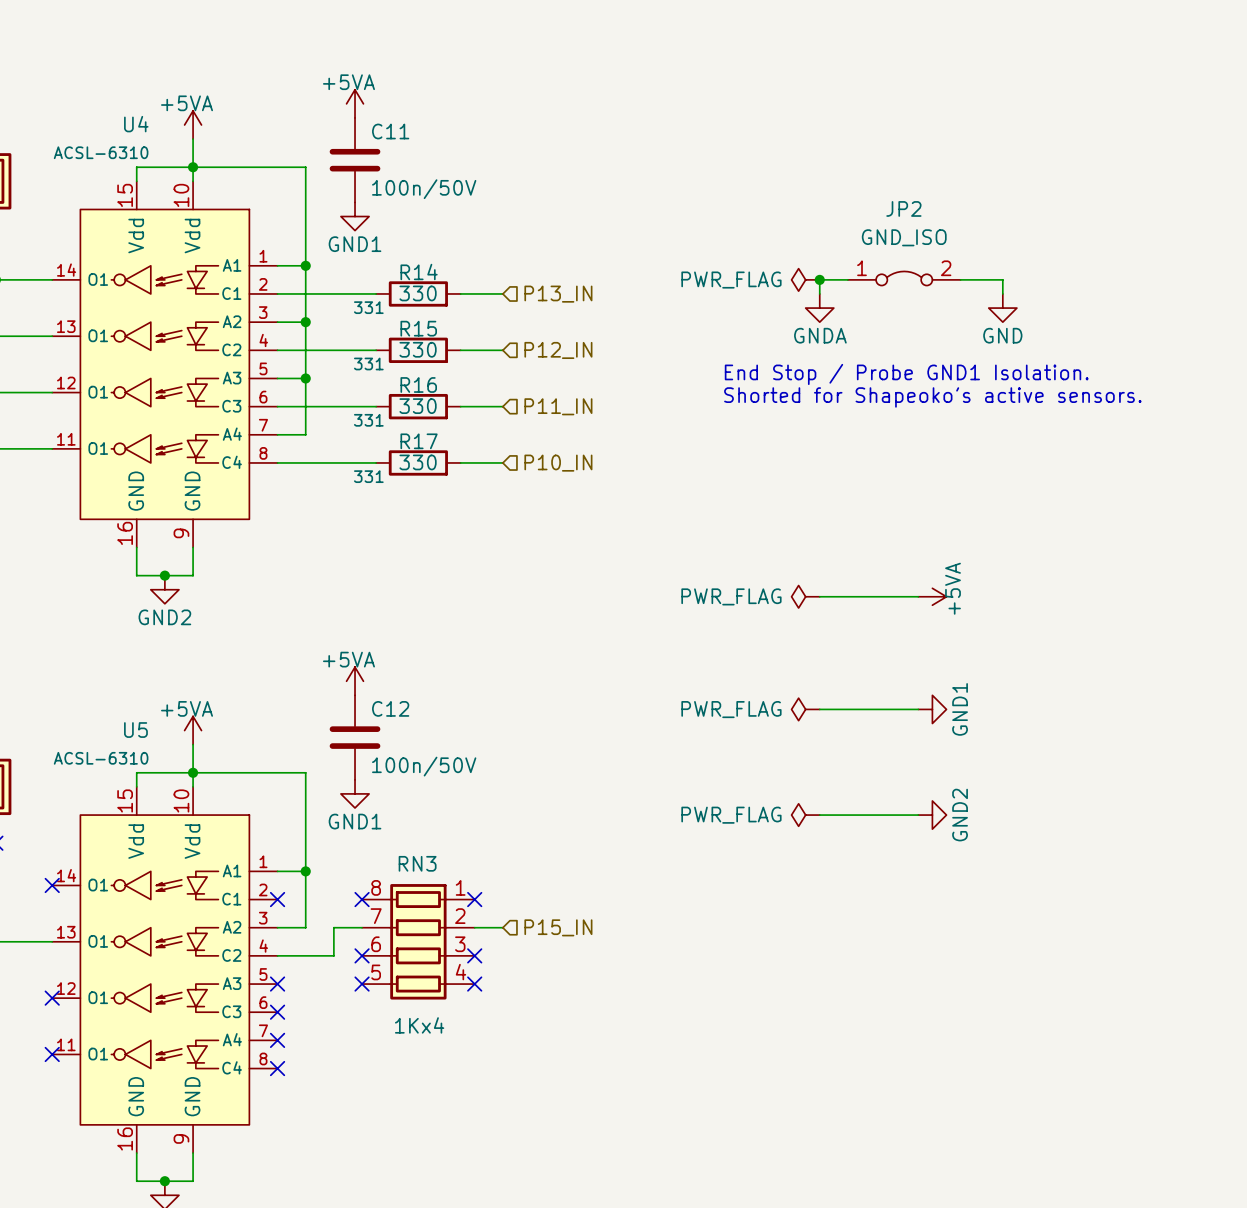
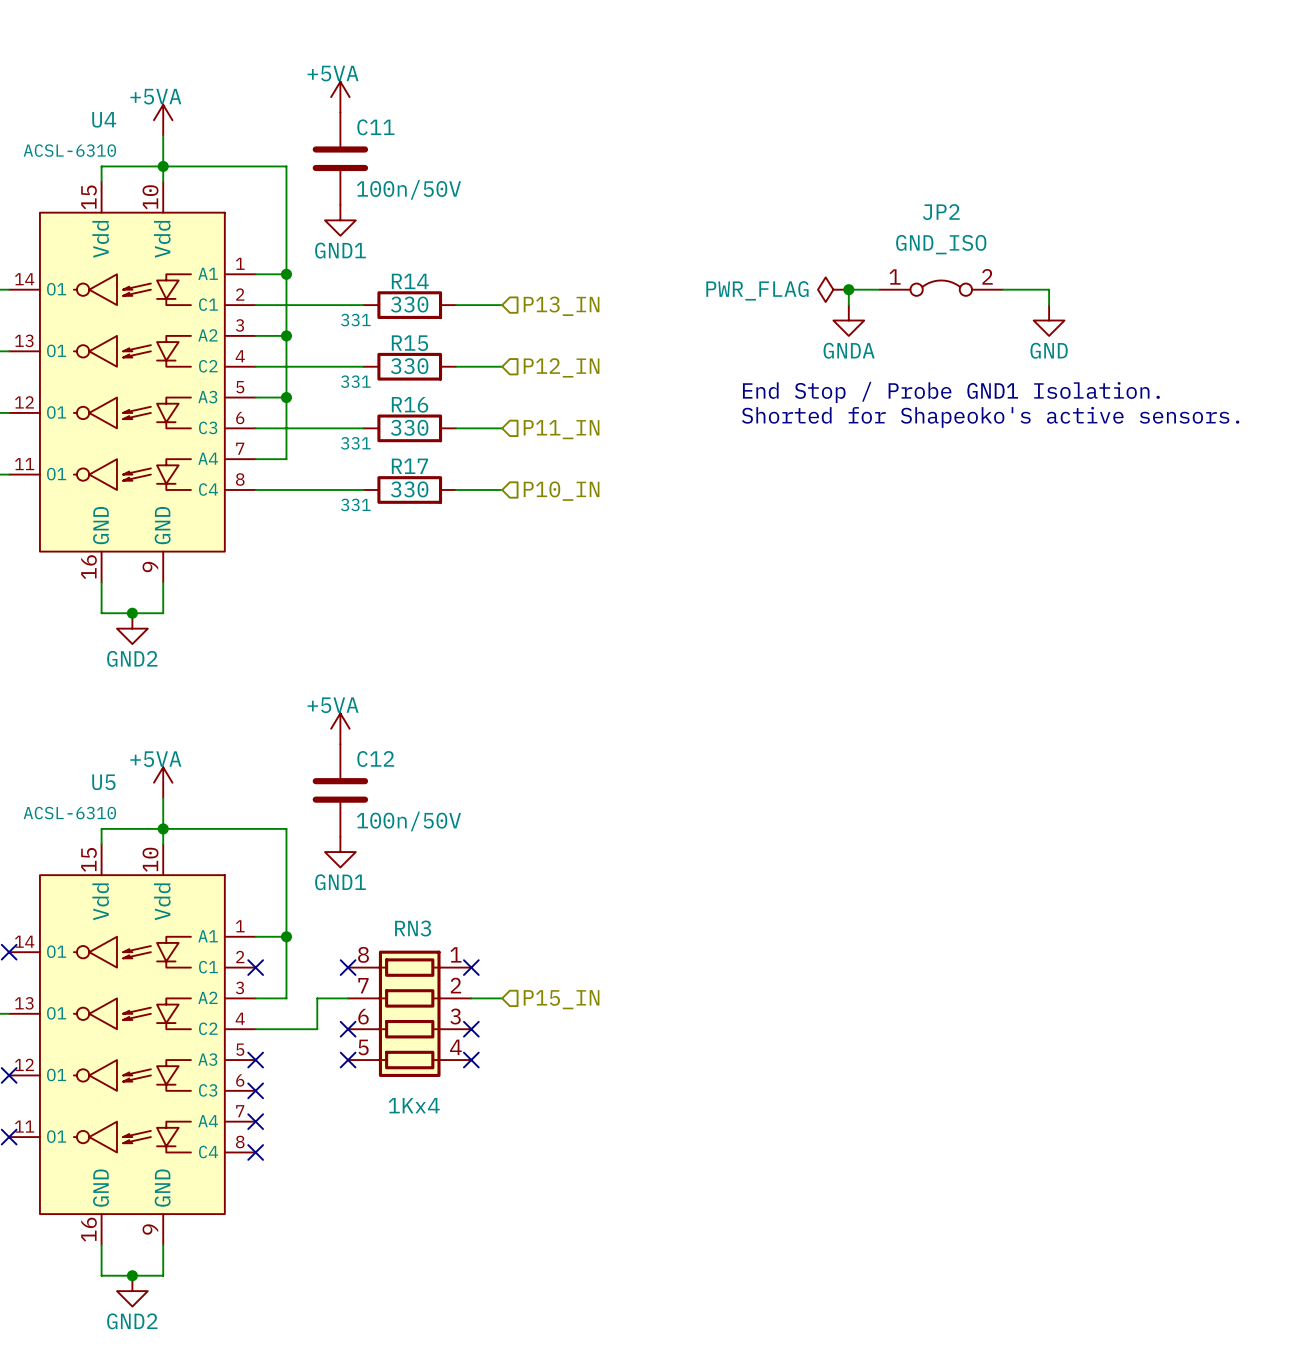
power symbol: PWR_FLAG (805, 596) -> none
wire: (819, 596) (918, 596) -> none
power symbol: +5VA (932, 596) -> none
power symbol: PWR_FLAG (805, 709) -> none
wire: (819, 709) (918, 709) -> none
power symbol: GND1 (932, 709) -> none
power symbol: PWR_FLAG (805, 815) -> none
wire: (819, 815) (918, 815) -> none
power symbol: GND2 (932, 815) -> none

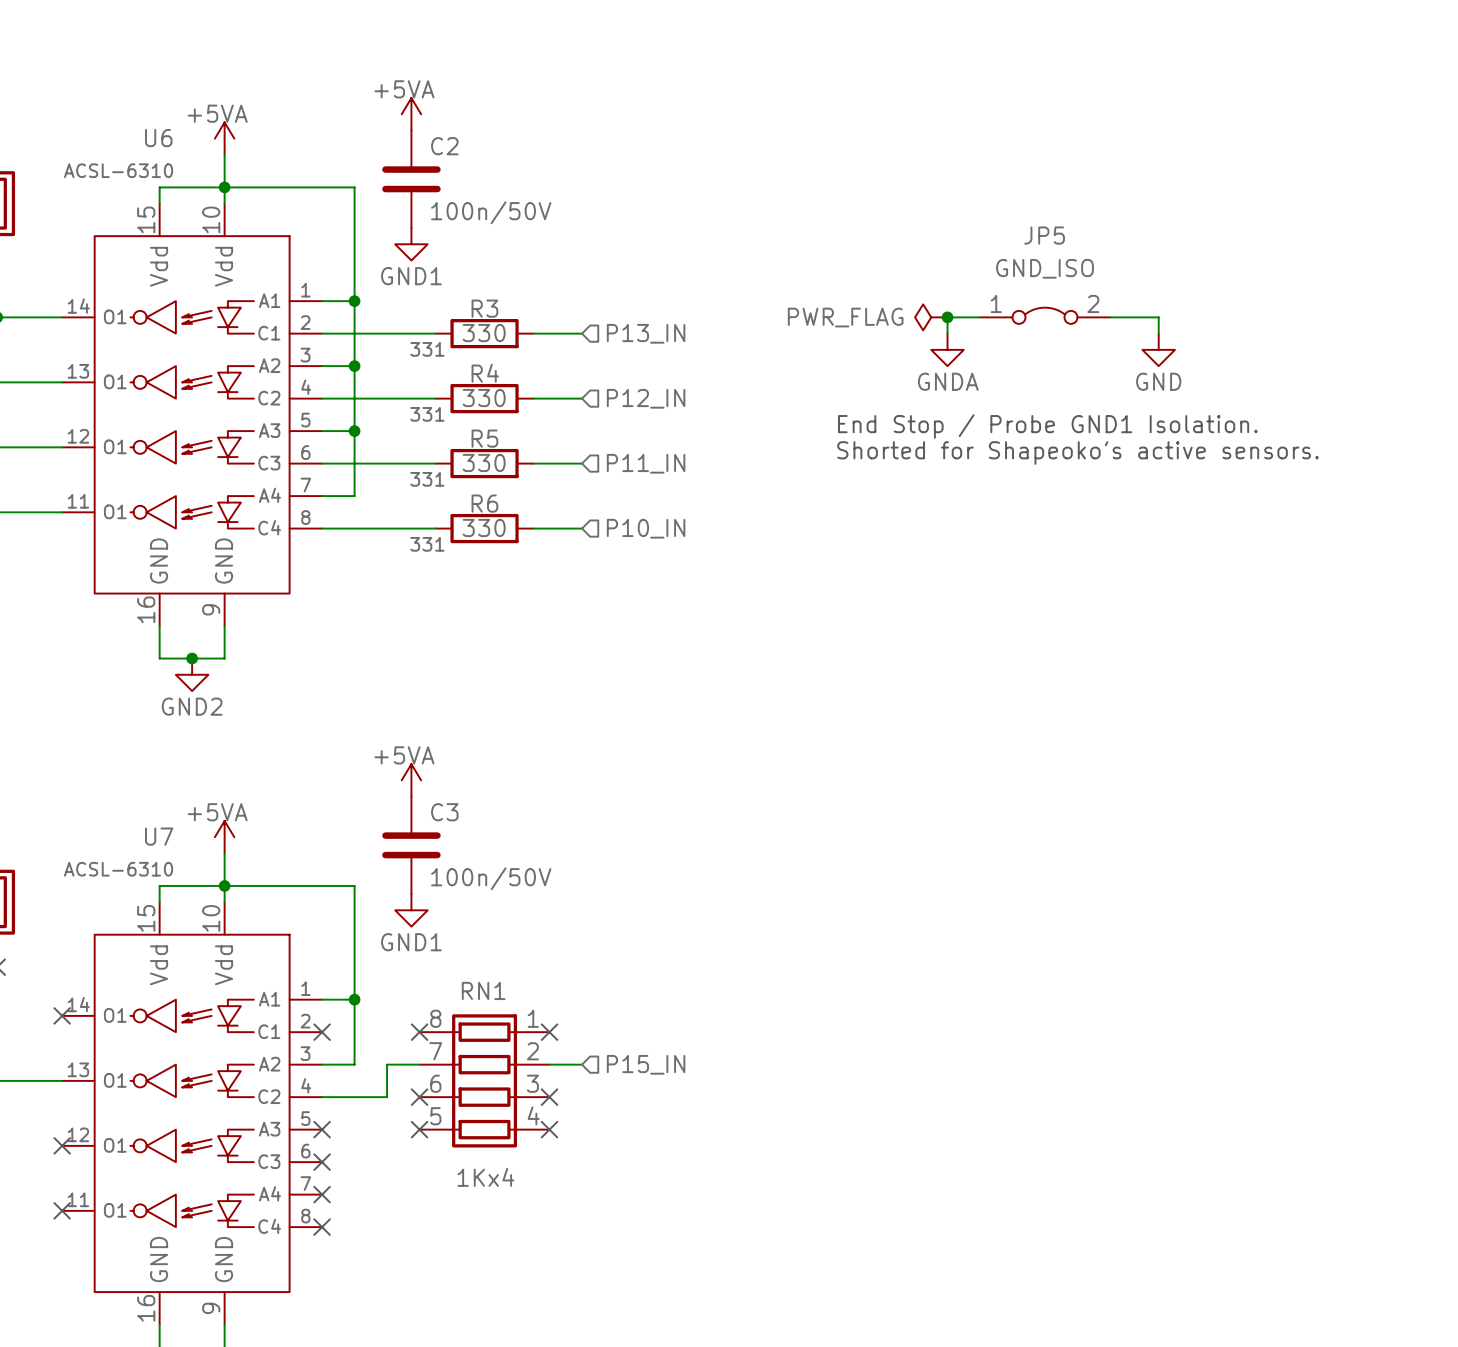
U4 name: U4 (104, 119) -> U6 (158, 138)
C11 name: C11 (375, 127) -> C2 (444, 146)
JP2 name: JP2 (941, 212) -> JP5 (1044, 235)
R14 name: R14 (410, 281) -> R3 (484, 308)
R15 name: R15 (409, 343) -> R4 (485, 373)
R16 name: R16 (410, 404) -> R5 (484, 438)
R17 name: R17 (409, 466) -> R6 (484, 503)
C12 name: C12 (375, 759) -> C3 (444, 812)
U5 name: U5 (103, 782) -> U7 (159, 836)
RN3 name: RN3 (413, 928) -> RN1 (483, 990)

